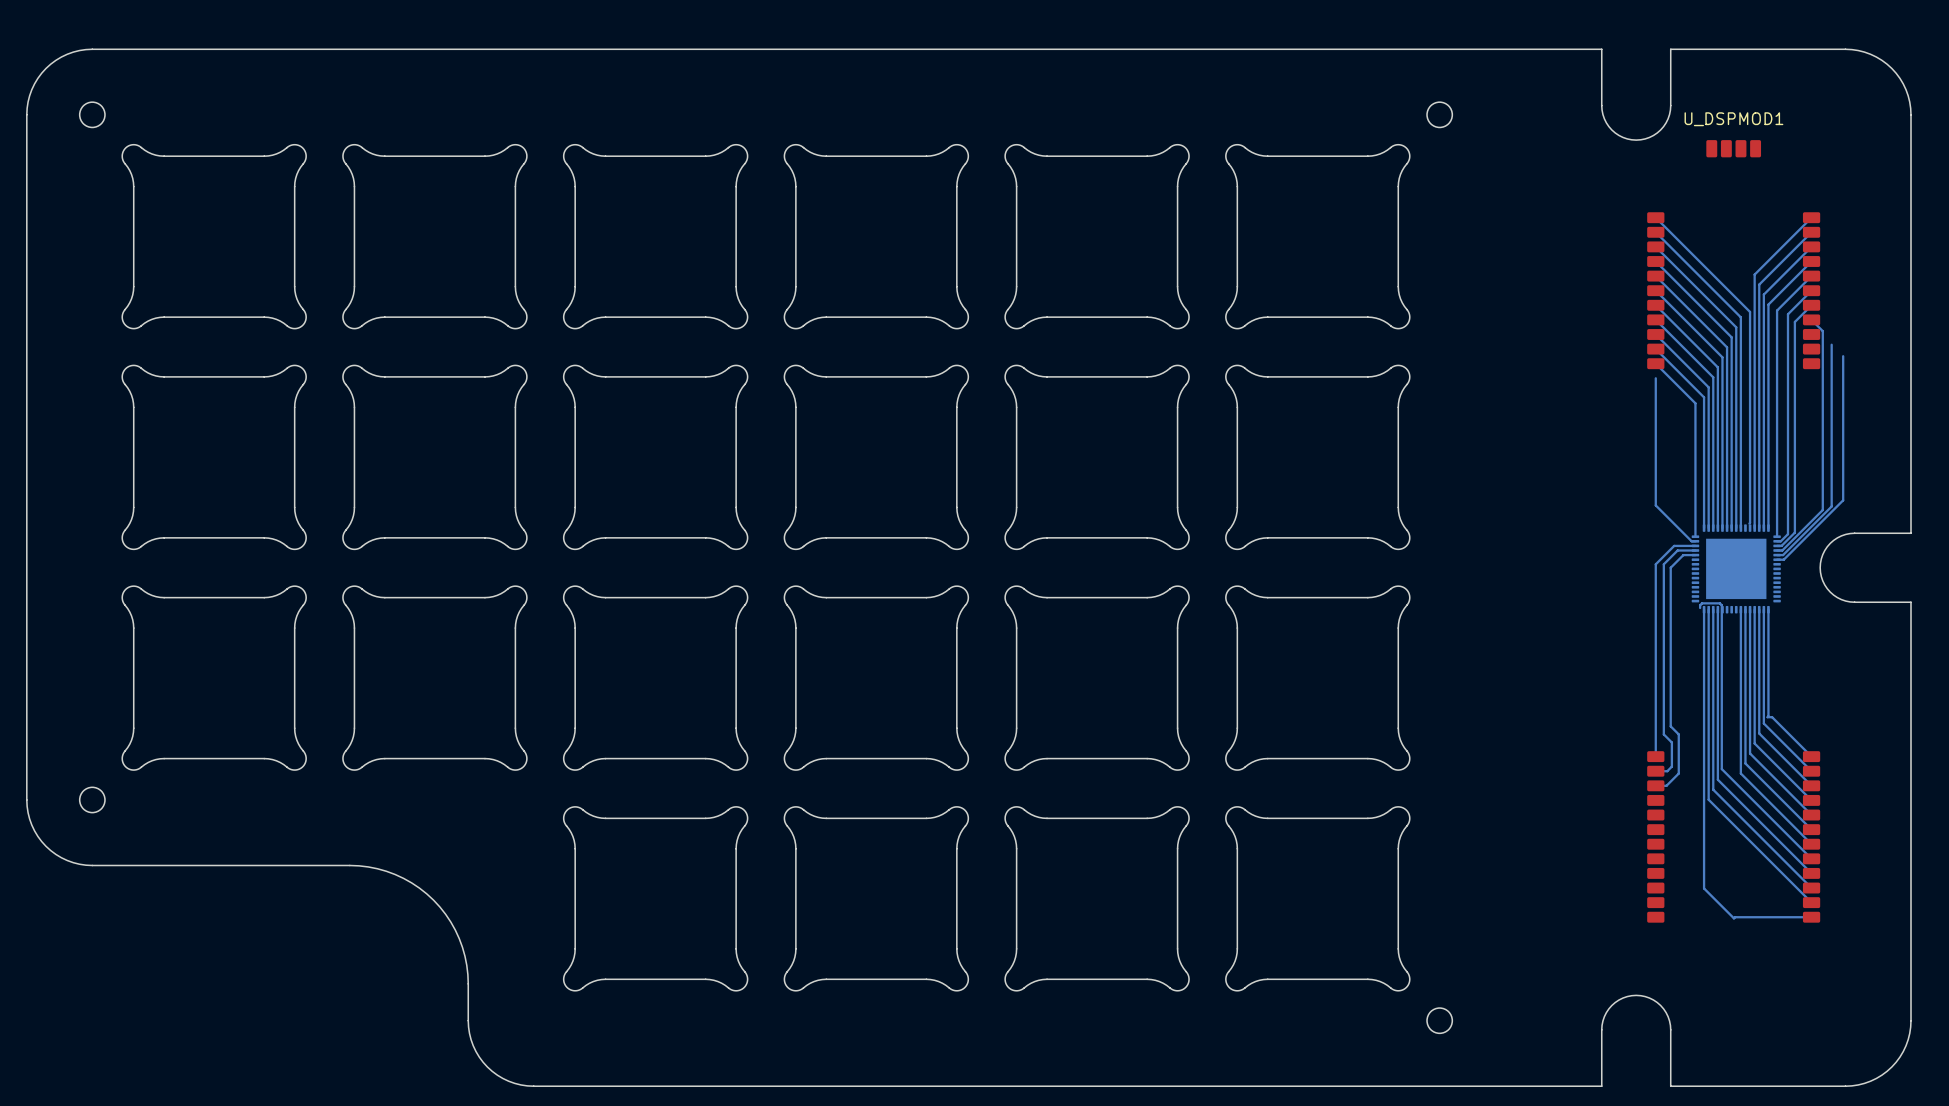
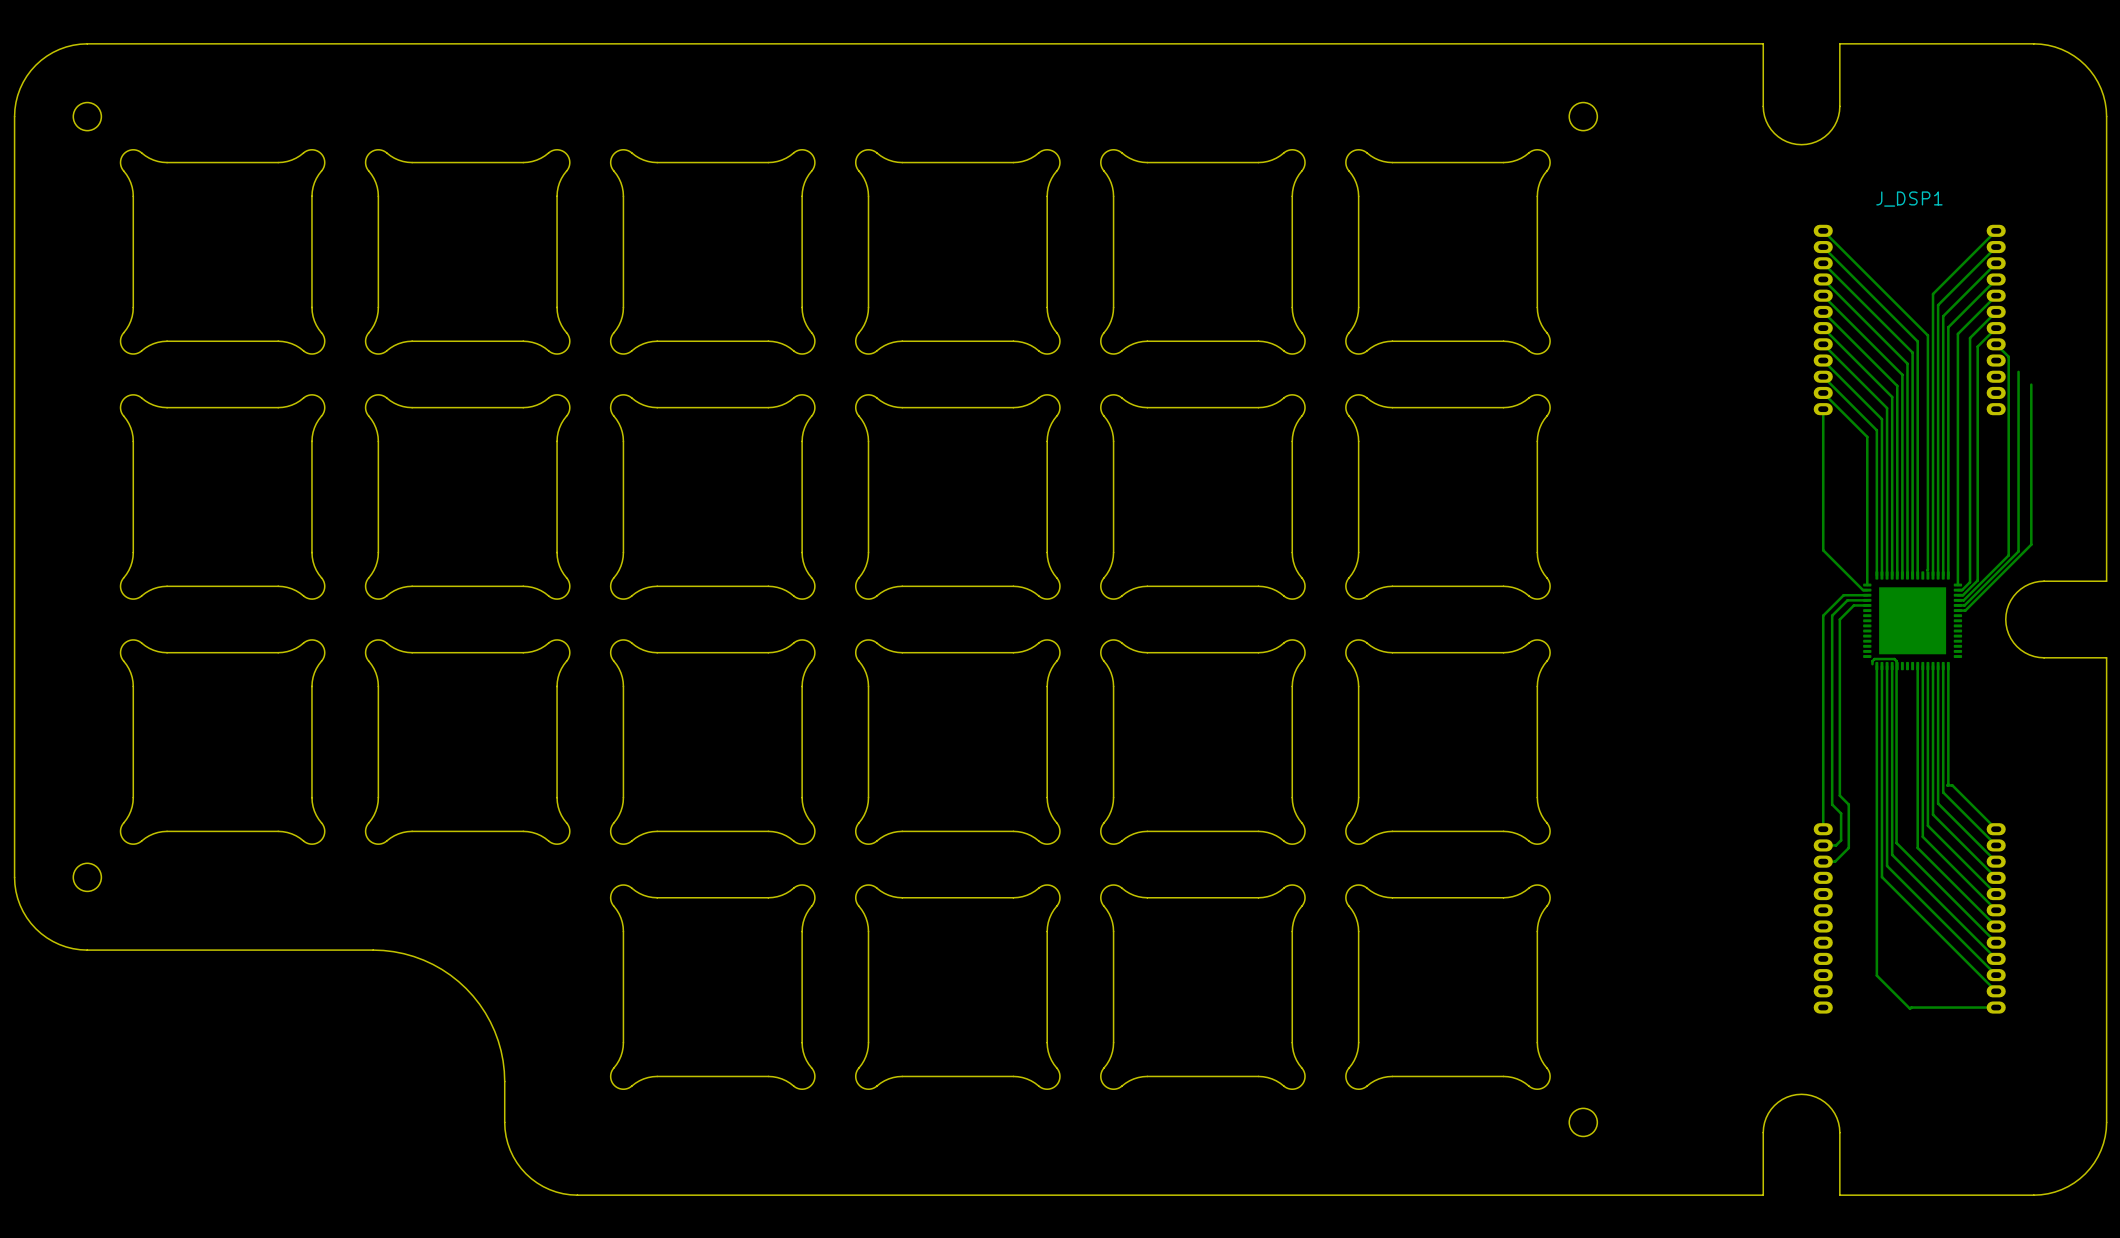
U_DSPMOD1: (1733, 531) -> none
J_DSP1: none -> (1909, 619)

